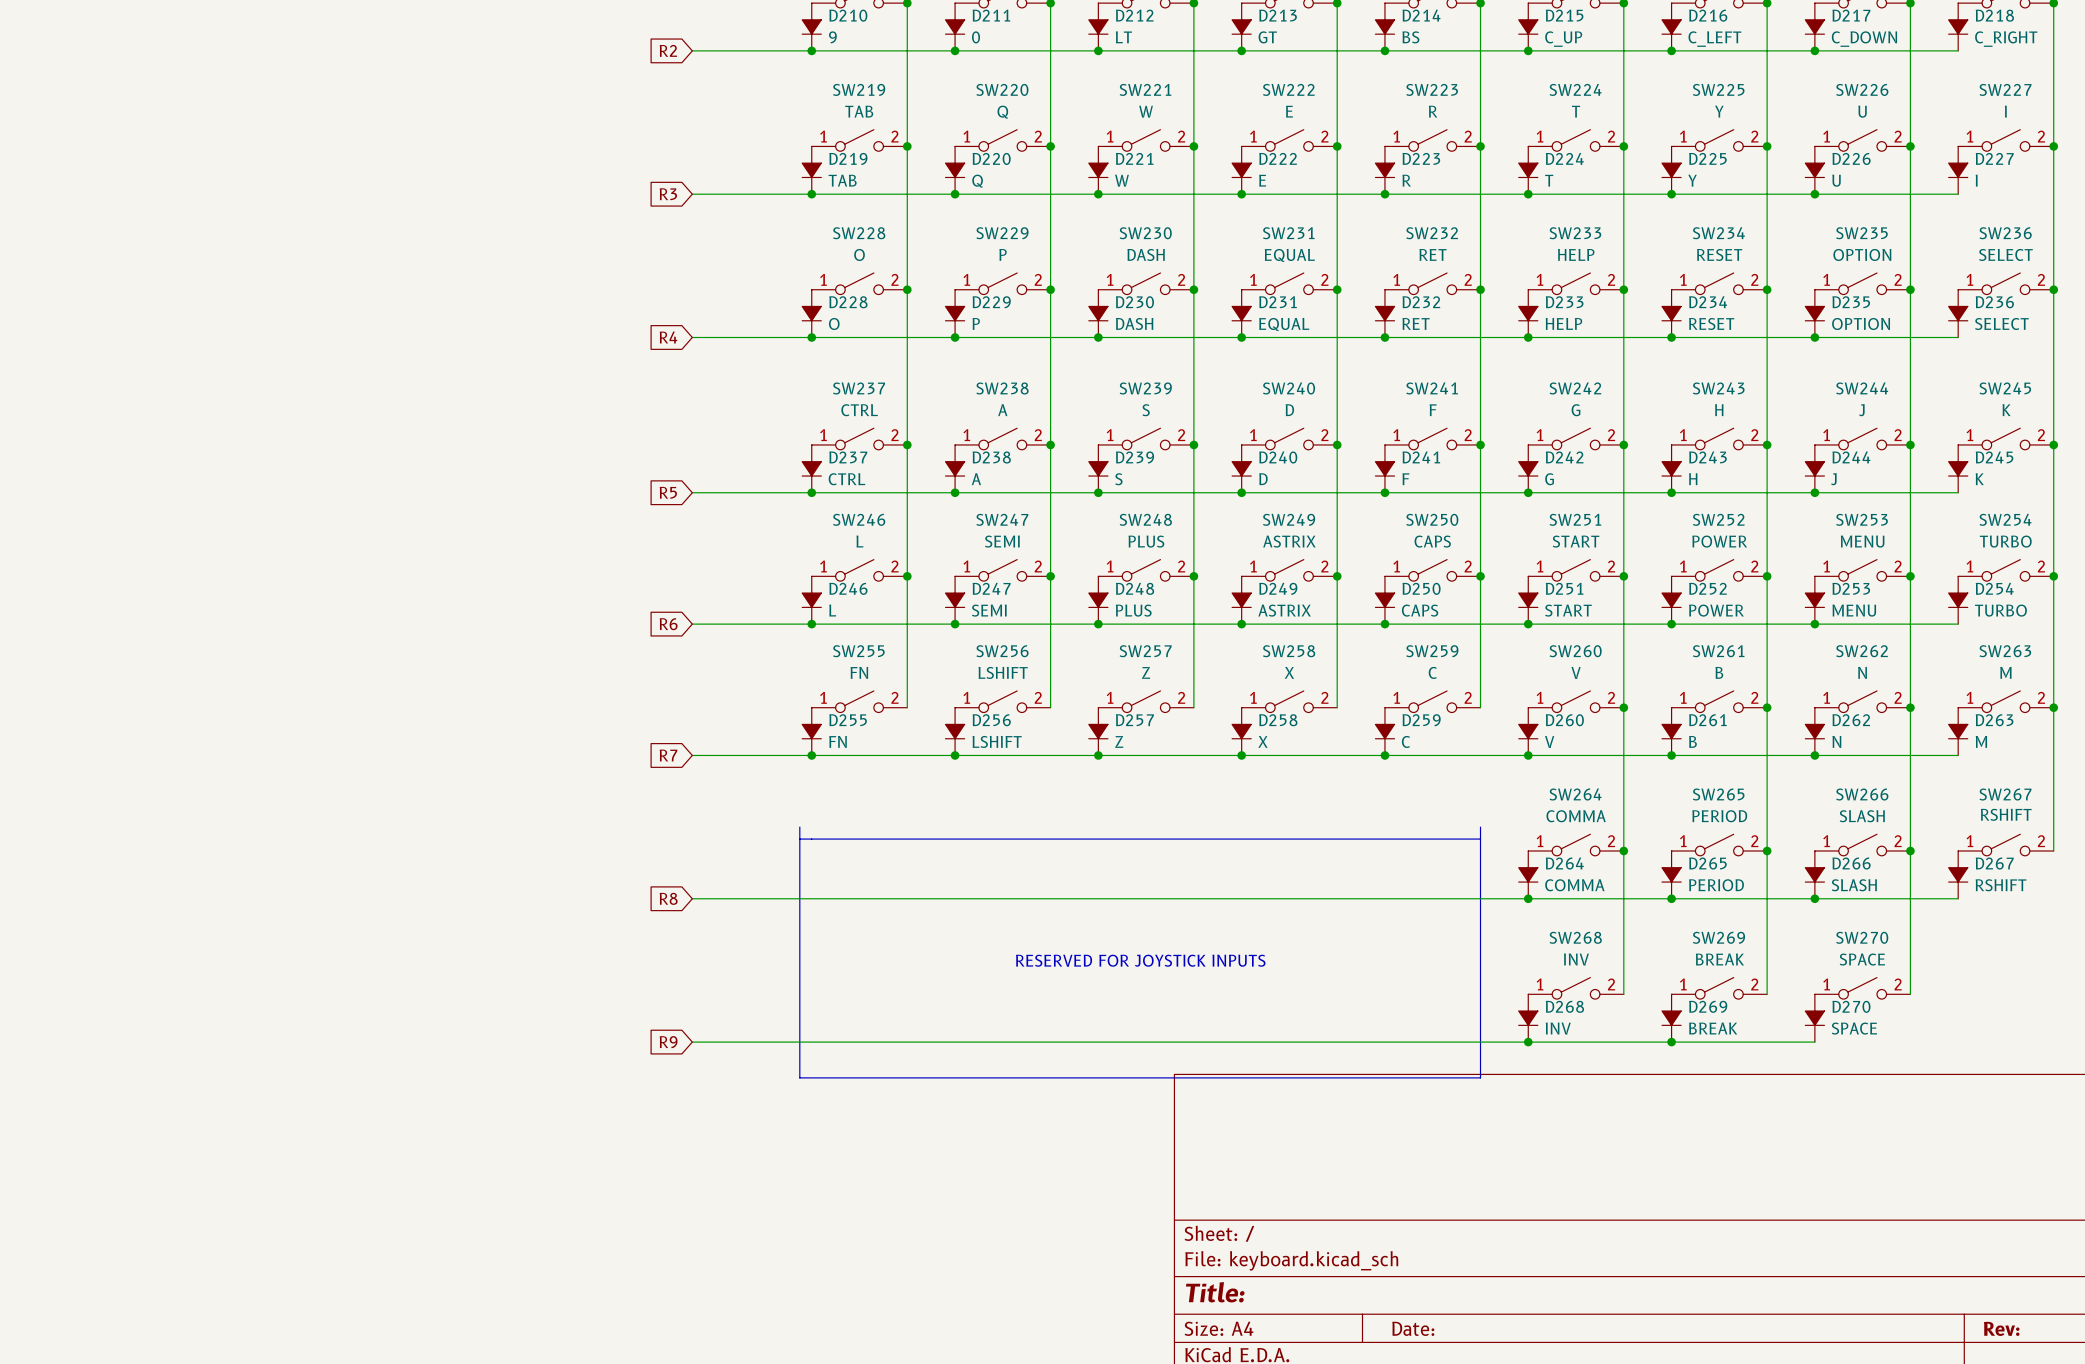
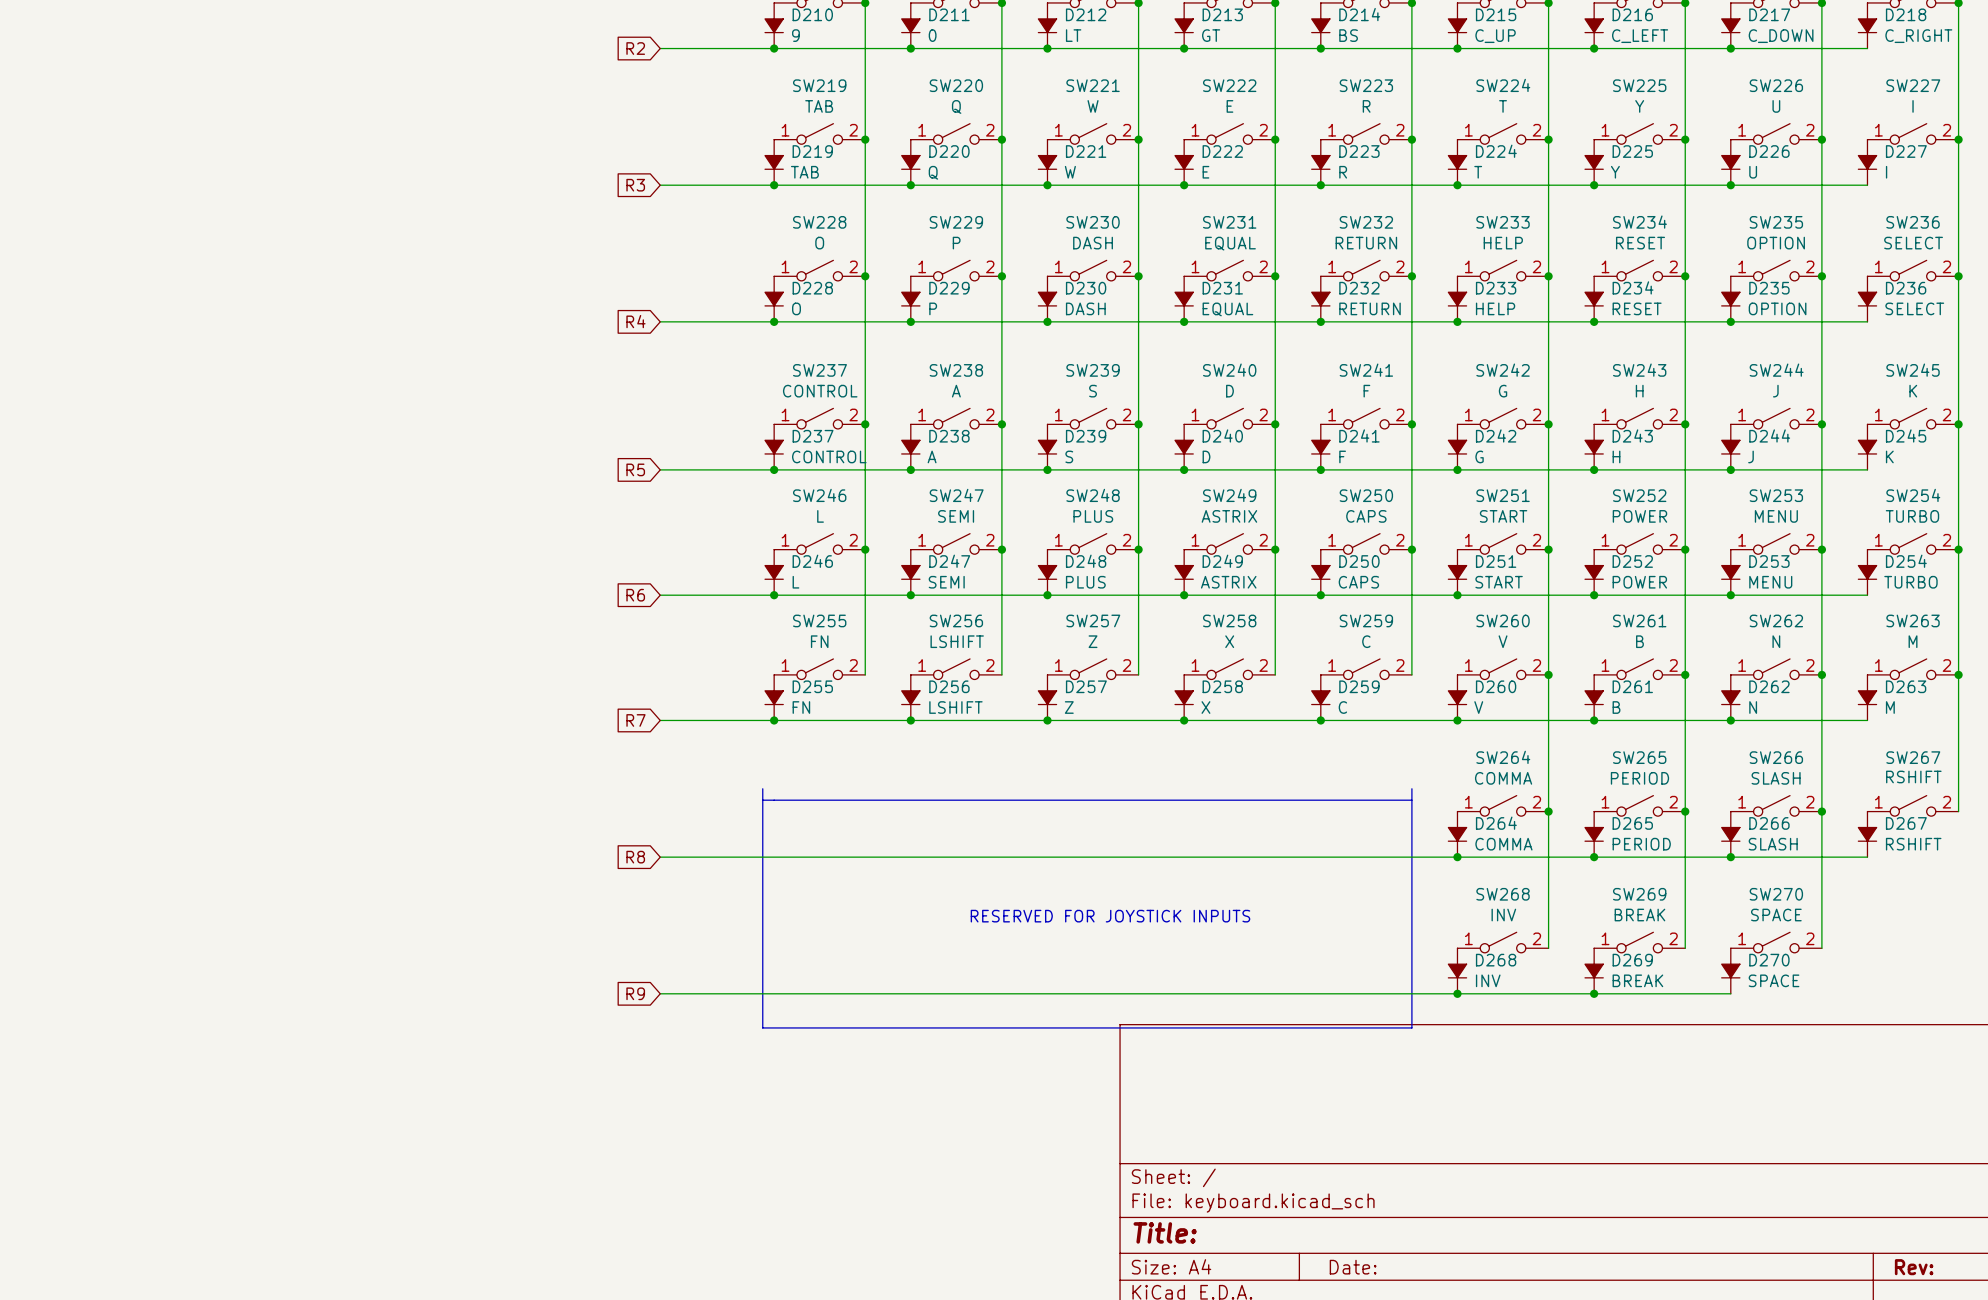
SW232 value: RET (1433, 254) -> RETURN (1366, 243)
D232 value: RET (1416, 323) -> RETURN (1370, 308)
SW237 value: CTRL (859, 410) -> CONTROL (820, 391)
D237 value: CTRL (846, 479) -> CONTROL (829, 456)

